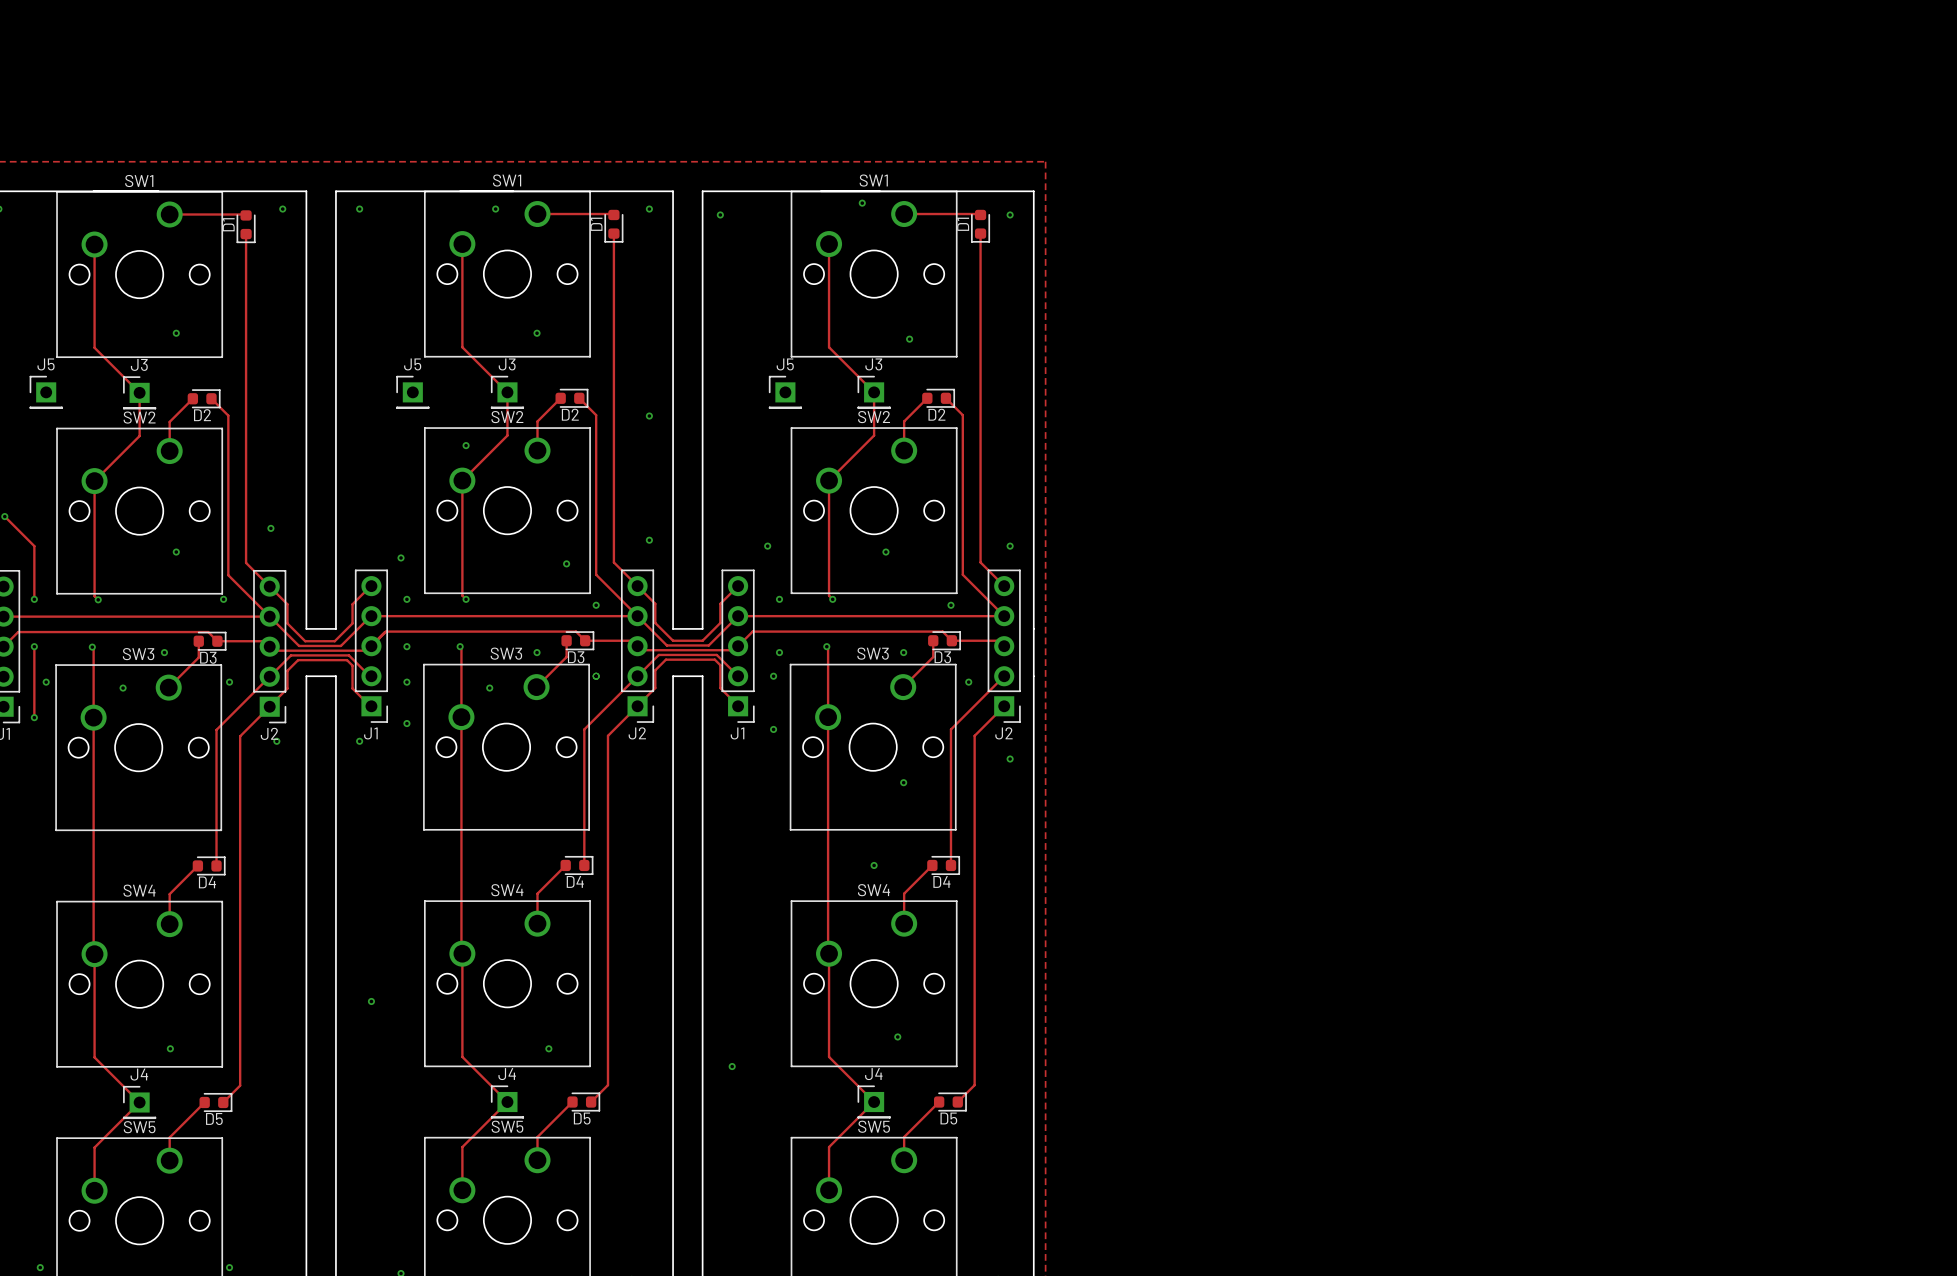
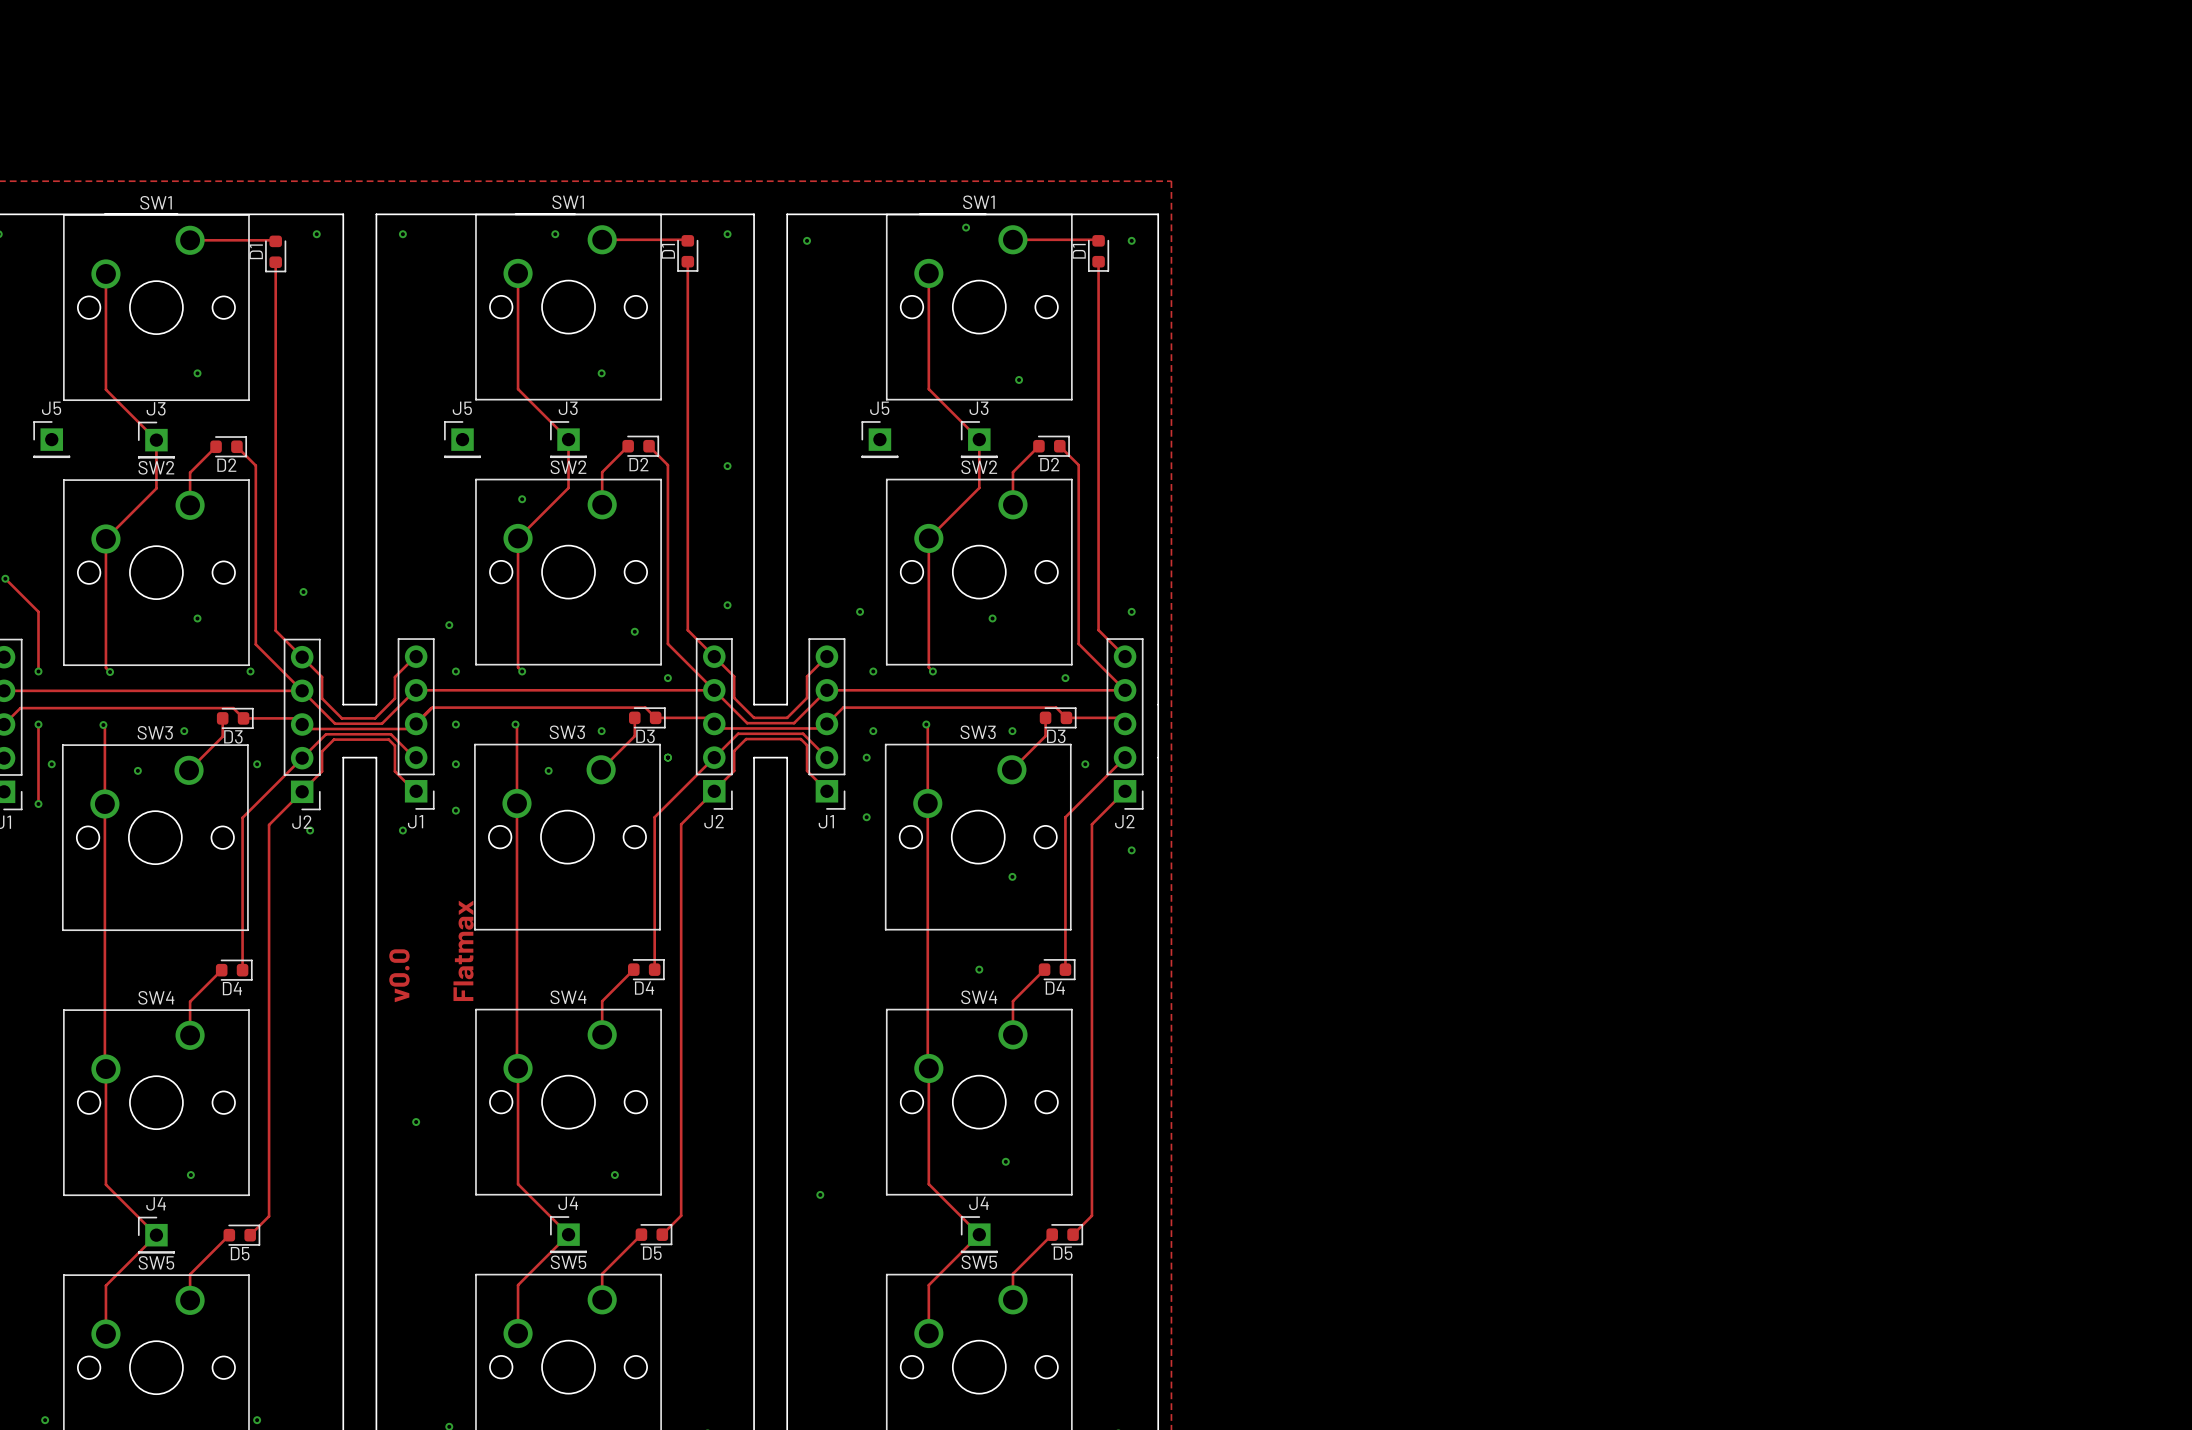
text: none -> Flatmax (463, 950)
text: none -> v0.0 (399, 975)

